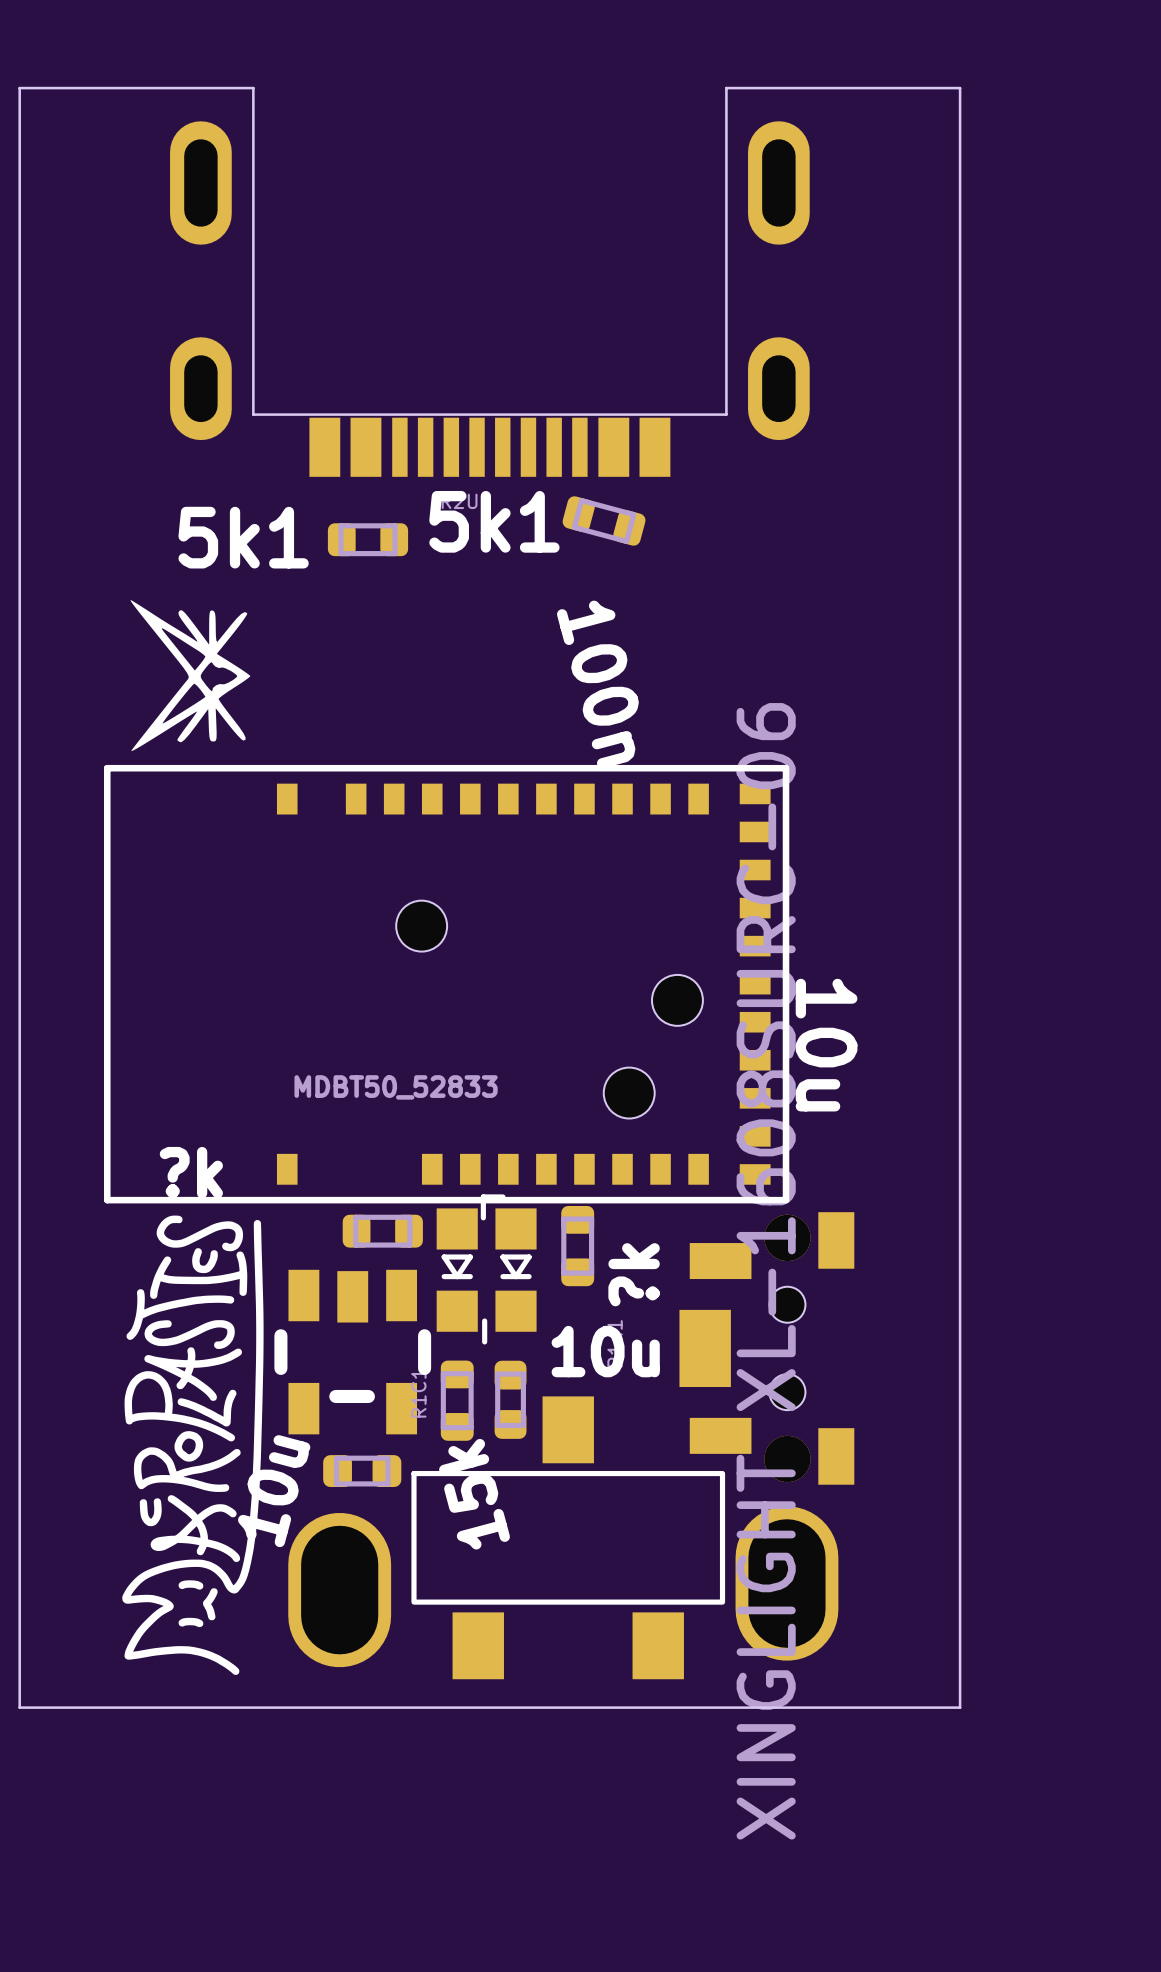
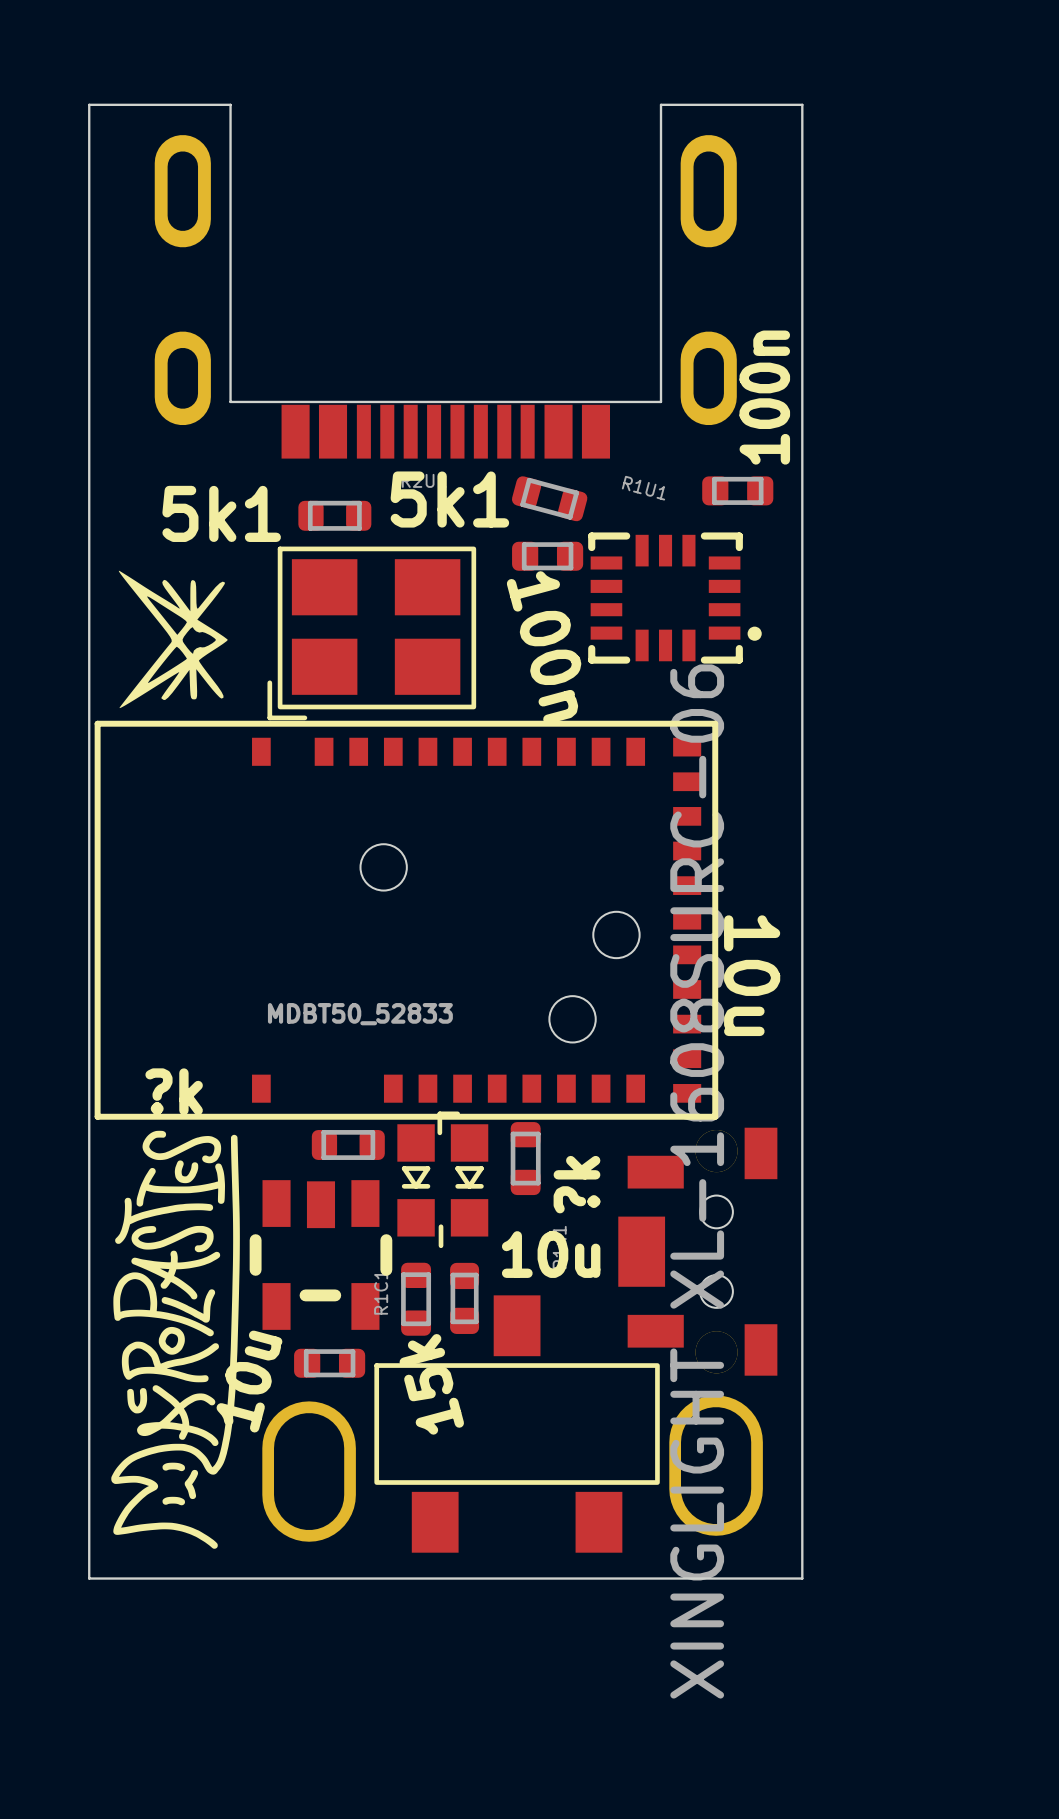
board edge: (98, 88) (19, 88) (19, 1707) (98, 1707) -> (89, 104) (89, 1578)
board edge: (881, 88) (960, 88) (960, 1707) (881, 1707) -> (802, 104) (802, 1578)
text: none -> 100n (764, 397)
R1U1 name: none -> R1U1 (643, 488)
part: none -> (737, 490)
part: none -> (547, 556)
part: none -> (674, 598)
part: none -> (371, 633)

